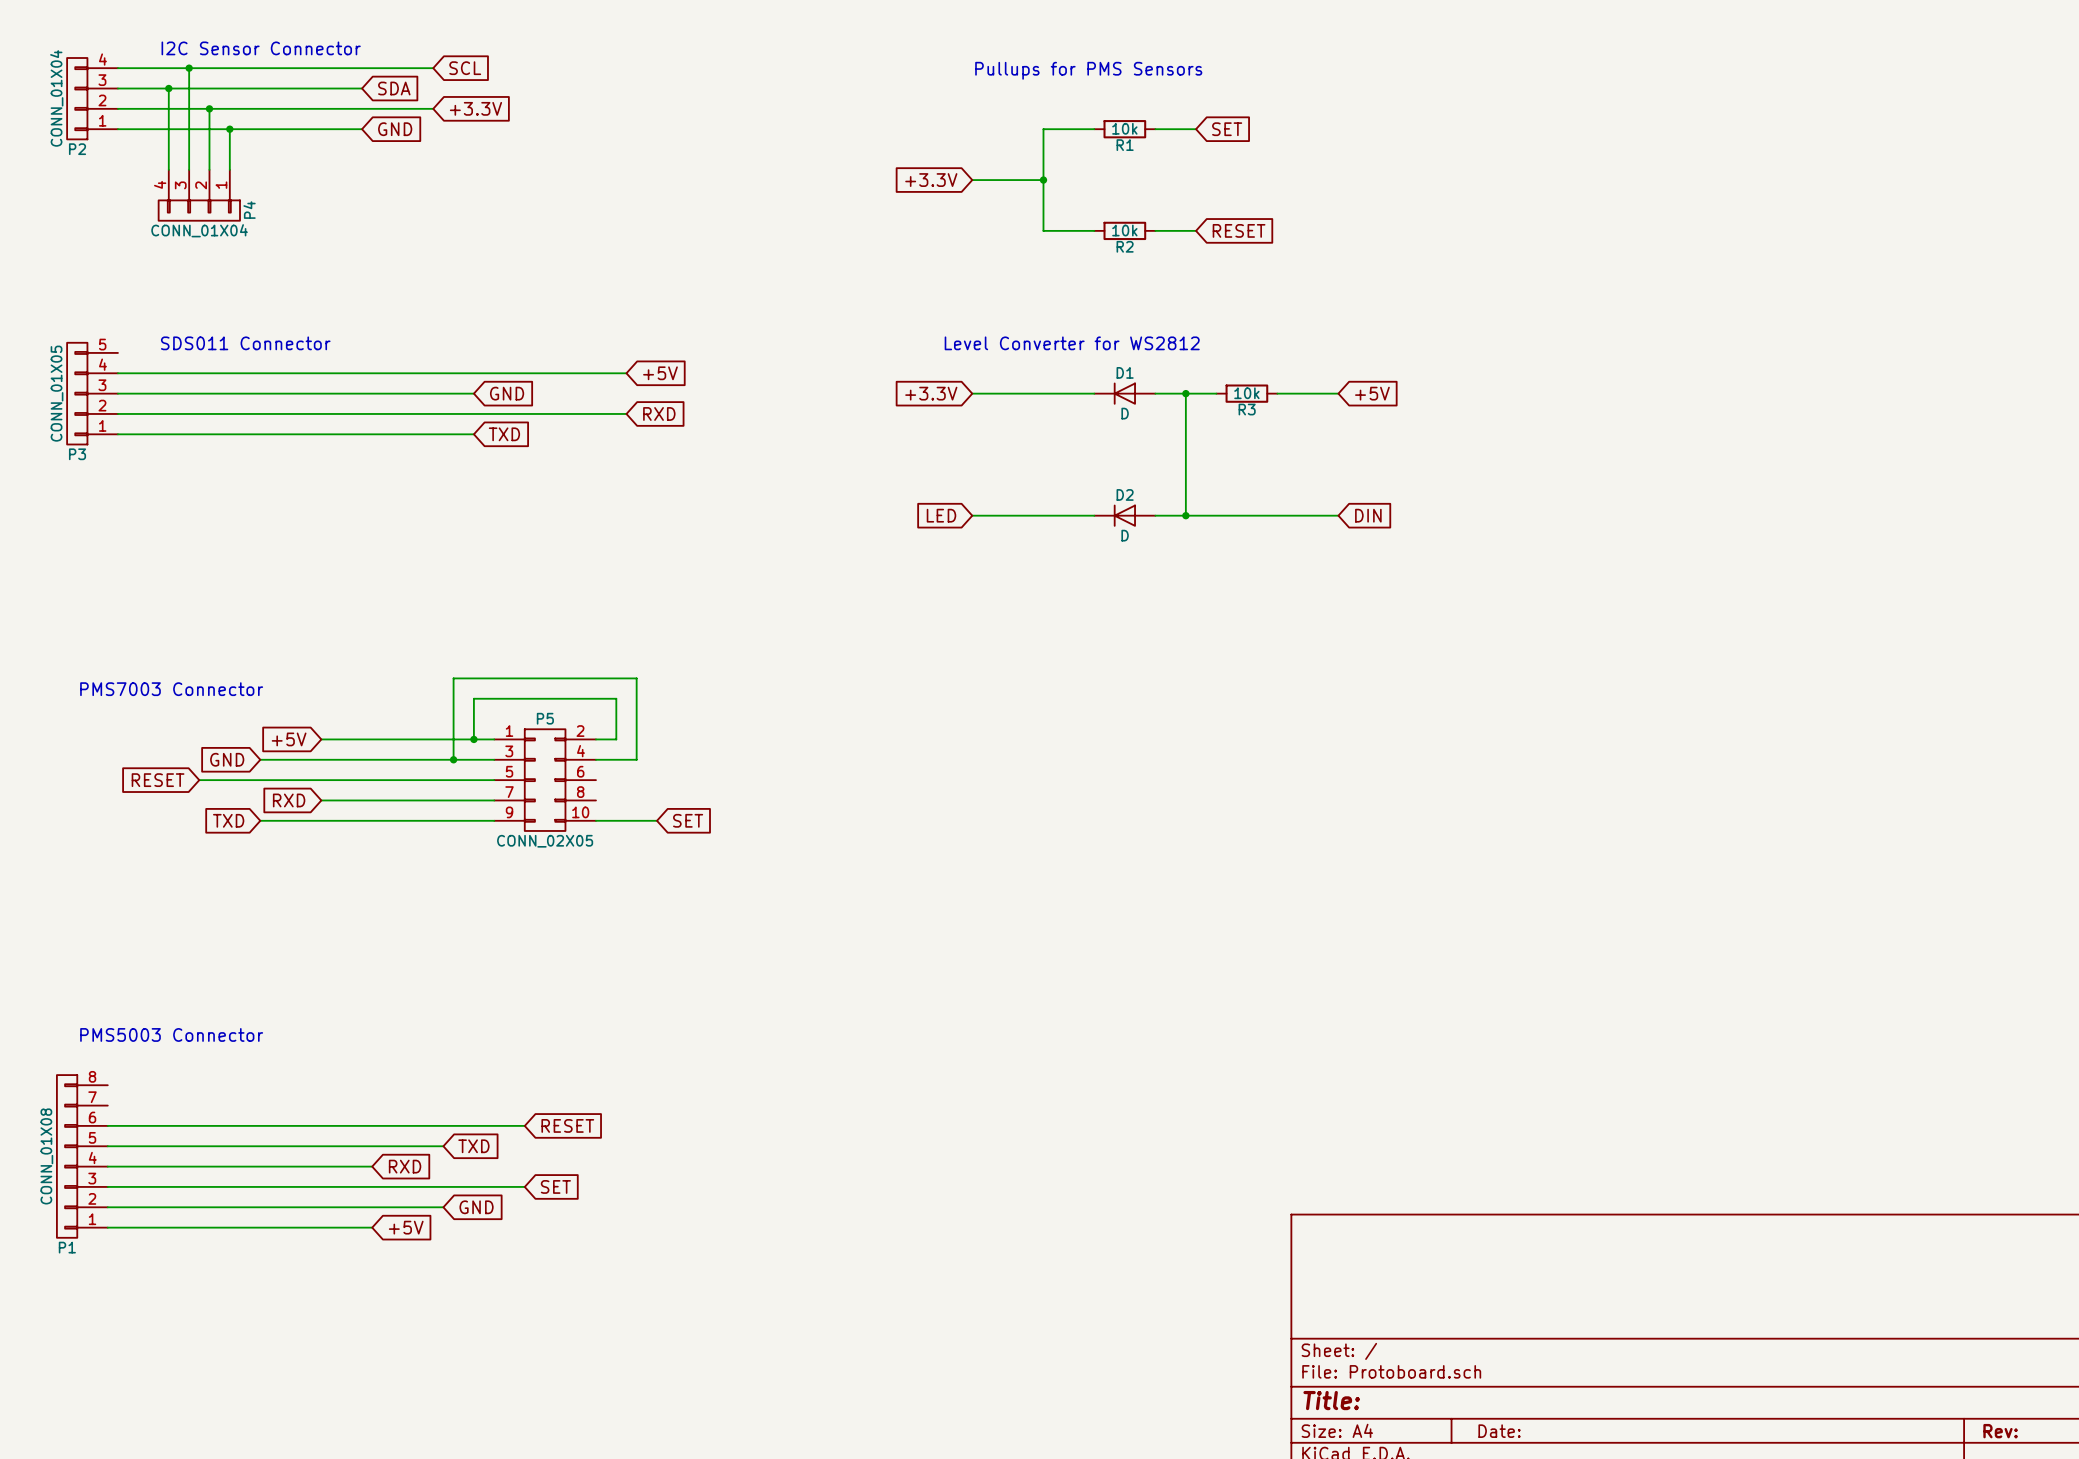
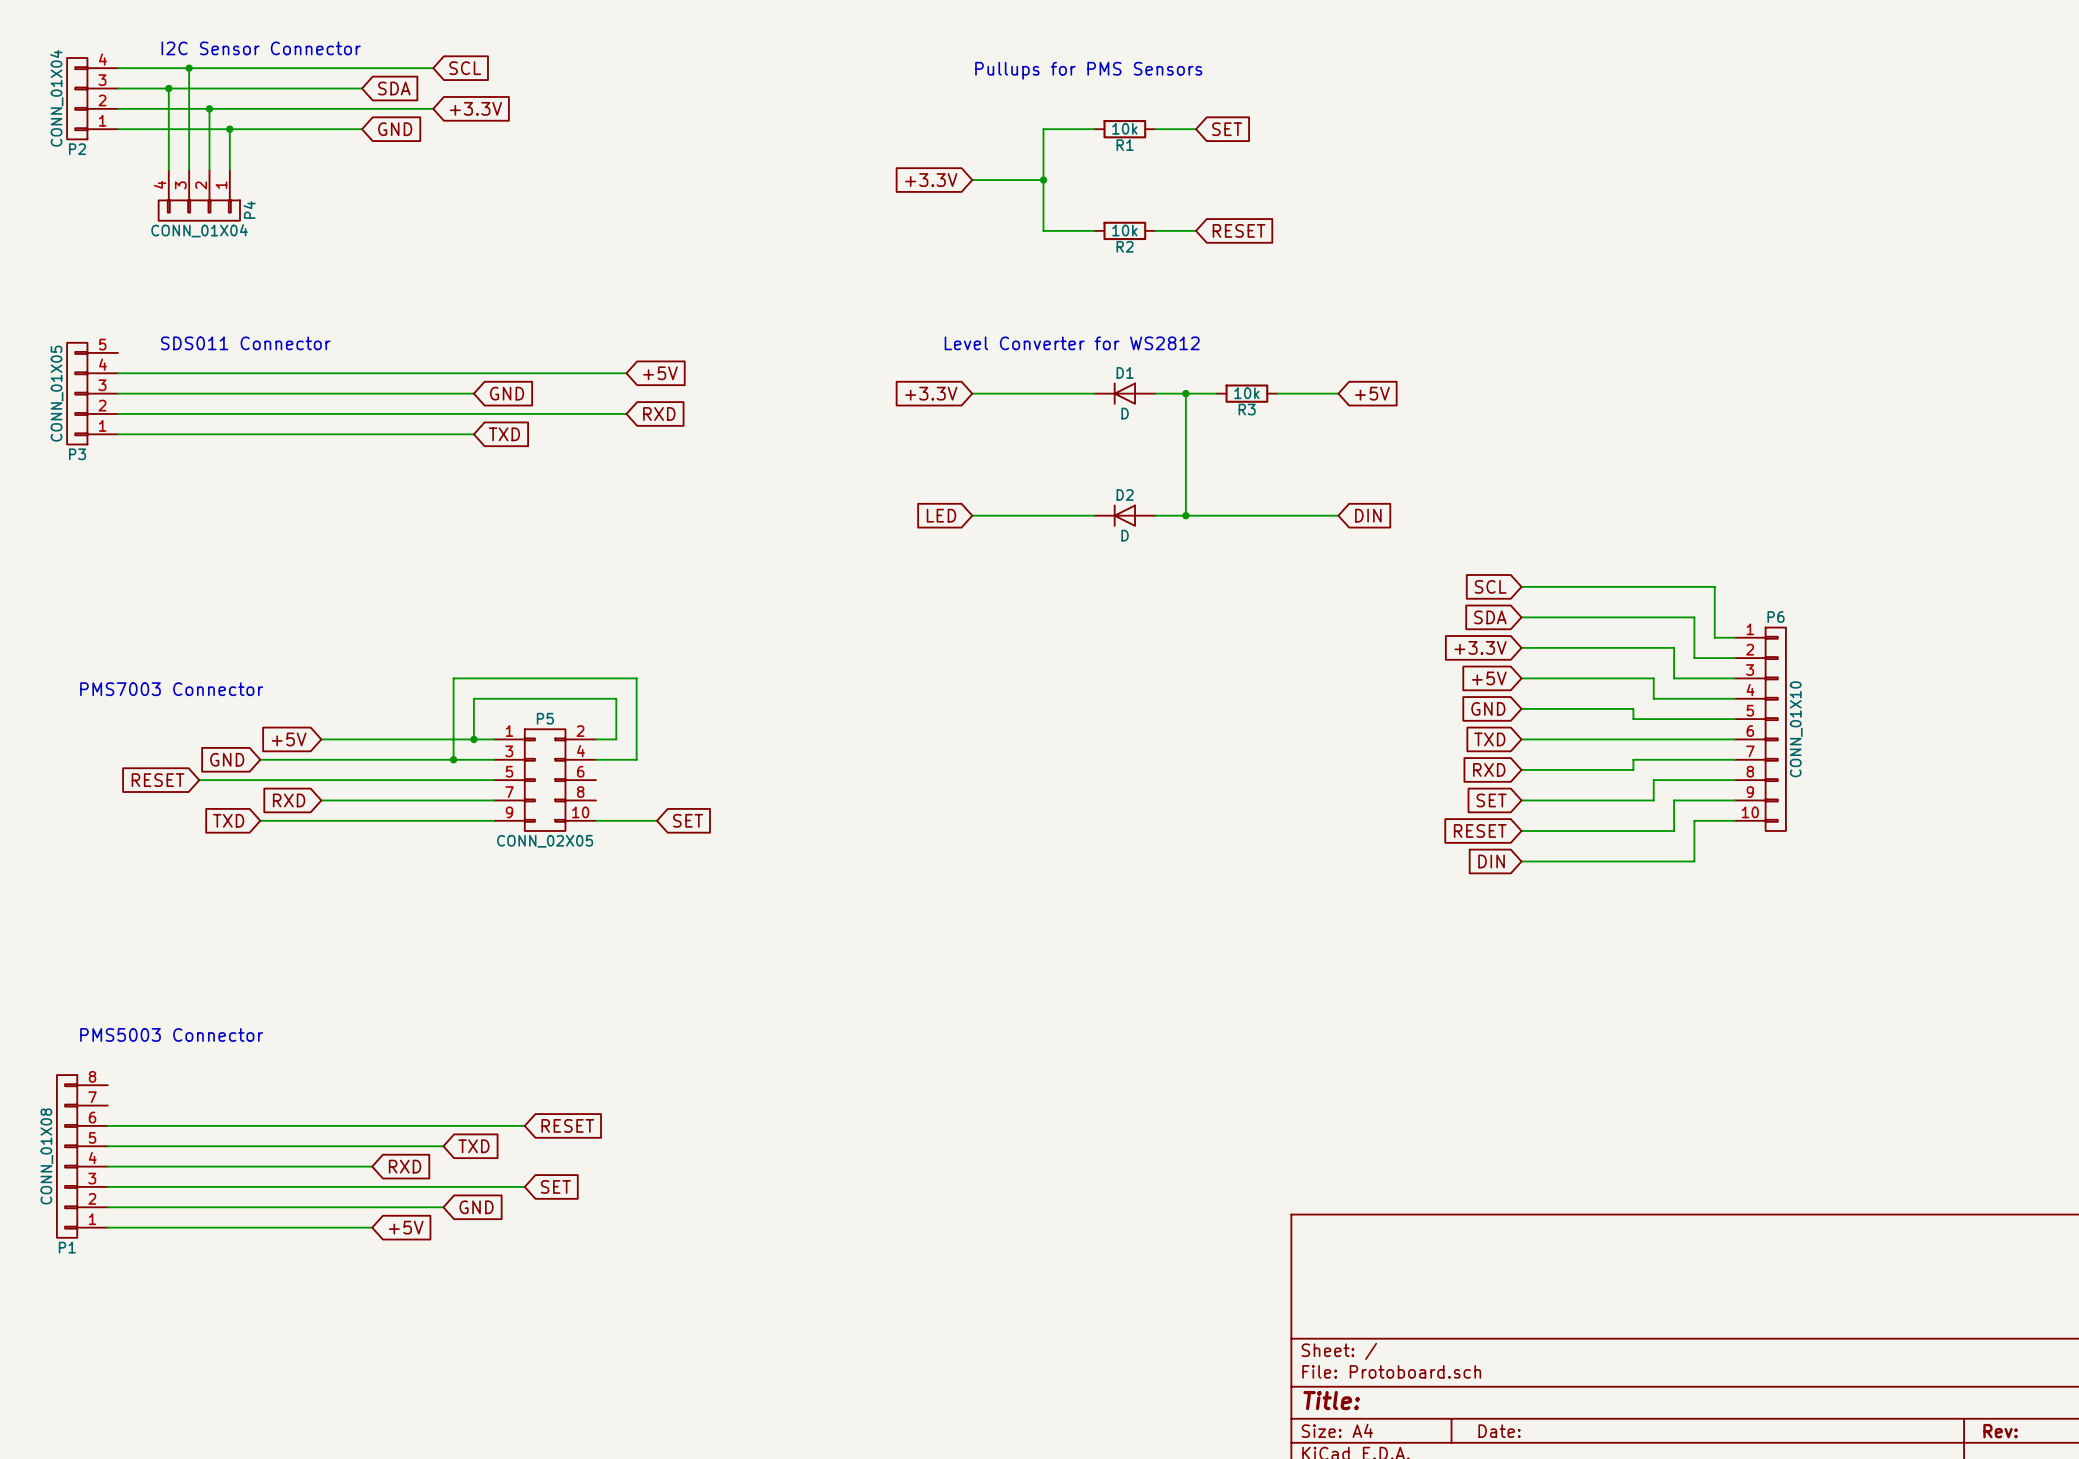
global label: none -> SCL (1490, 586)
wire: none -> (1521, 586) (1714, 586) (1714, 637) (1735, 637)
global label: none -> SDA (1490, 617)
wire: none -> (1521, 617) (1694, 617) (1694, 658) (1735, 658)
global label: none -> +3.3V (1480, 647)
wire: none -> (1521, 647) (1674, 647) (1674, 678) (1735, 678)
global label: none -> +5V (1489, 678)
wire: none -> (1521, 678) (1653, 678) (1653, 698) (1735, 698)
global label: none -> GND (1488, 708)
wire: none -> (1521, 708) (1633, 708) (1633, 719) (1735, 719)
P6: none -> CONN_01X10 (1760, 729)
global label: none -> TXD (1489, 739)
wire: none -> (1521, 739) (1735, 739)
wire: none -> (1735, 759) (1633, 759) (1633, 769) (1521, 769)
global label: none -> RXD (1489, 769)
wire: none -> (1735, 780) (1653, 780) (1653, 800) (1521, 800)
global label: none -> SET (1491, 800)
wire: none -> (1735, 800) (1674, 800) (1674, 830) (1521, 830)
wire: none -> (1735, 820) (1694, 820) (1694, 861) (1521, 861)
global label: none -> RESET (1480, 830)
global label: none -> DIN (1491, 861)

